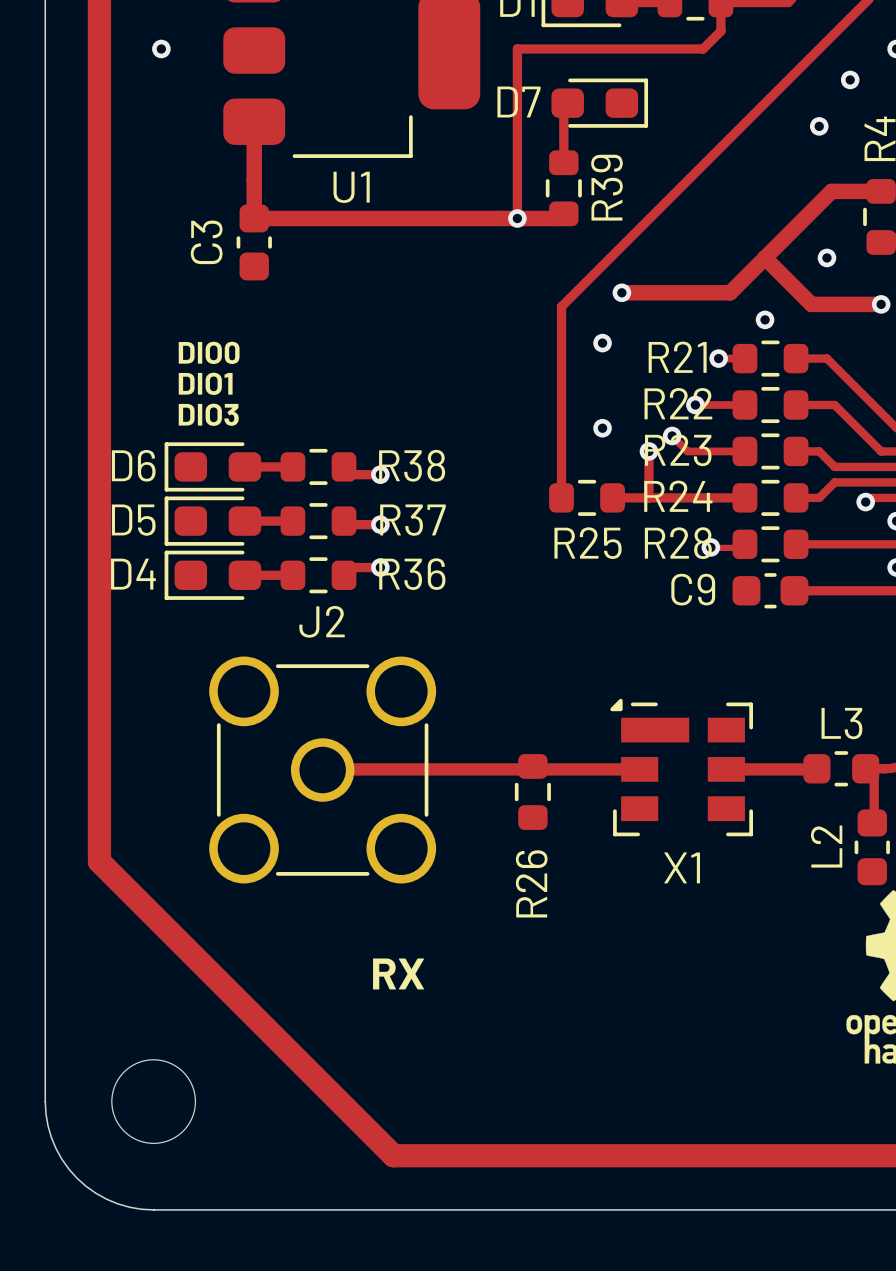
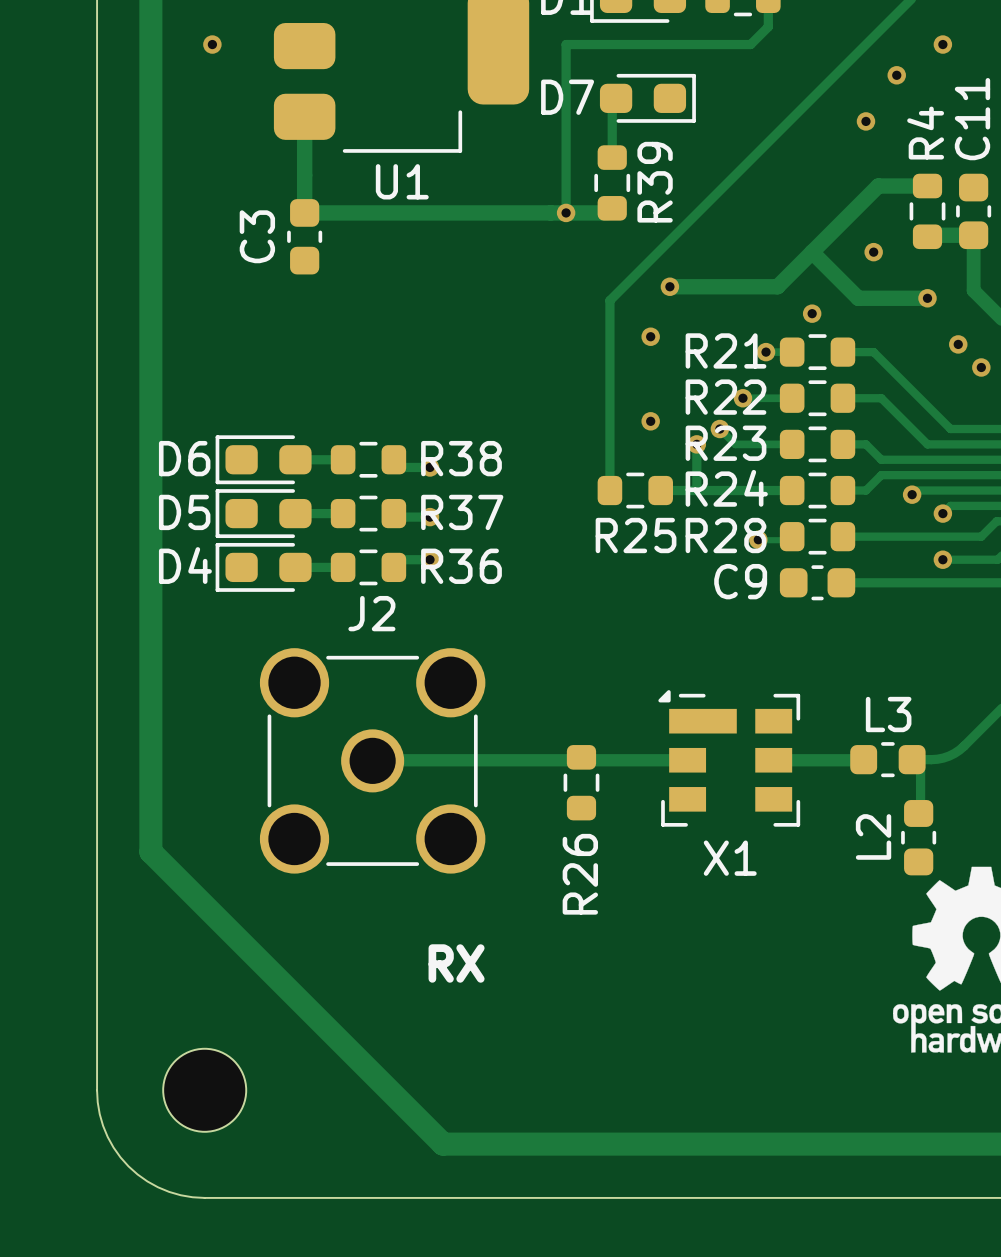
text: DIO0 (209, 352) -> none
text: DIO1 (205, 383) -> none
text: DIO3 (208, 414) -> none

